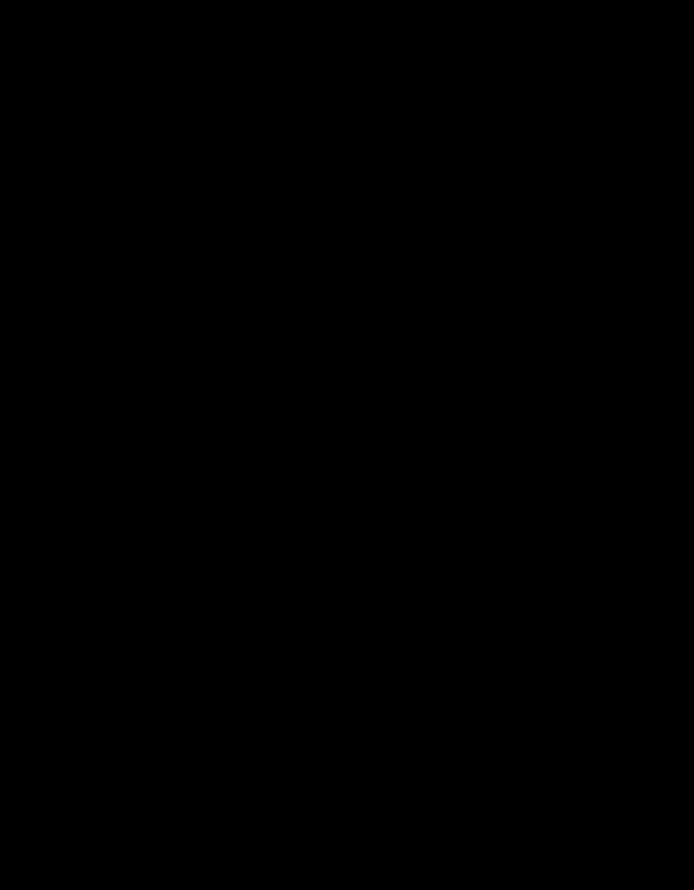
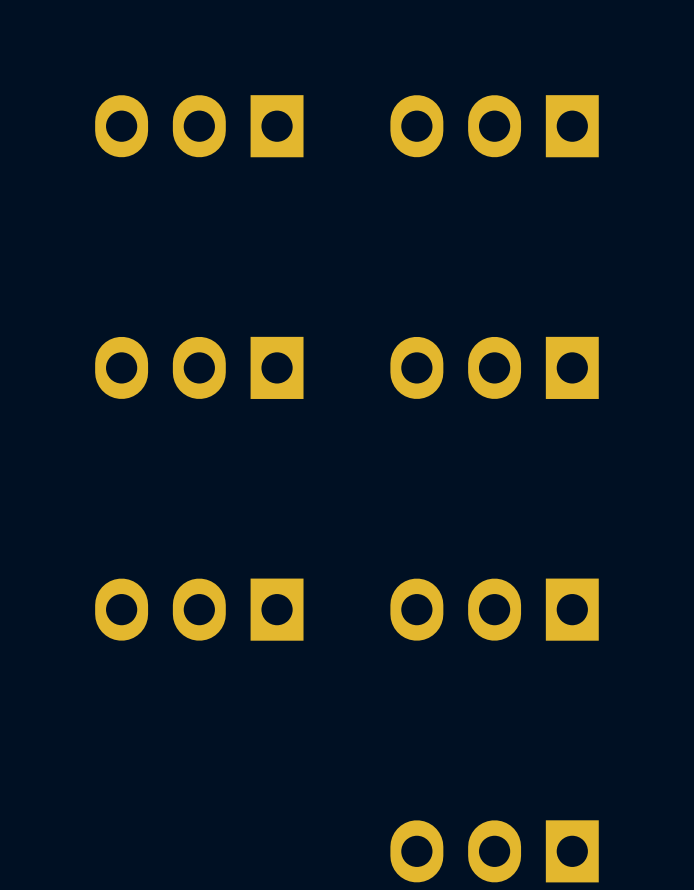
part: none -> (199, 126)
part: none -> (494, 126)
part: none -> (199, 367)
part: none -> (494, 367)
part: none -> (199, 609)
part: none -> (494, 609)
part: none -> (494, 851)

